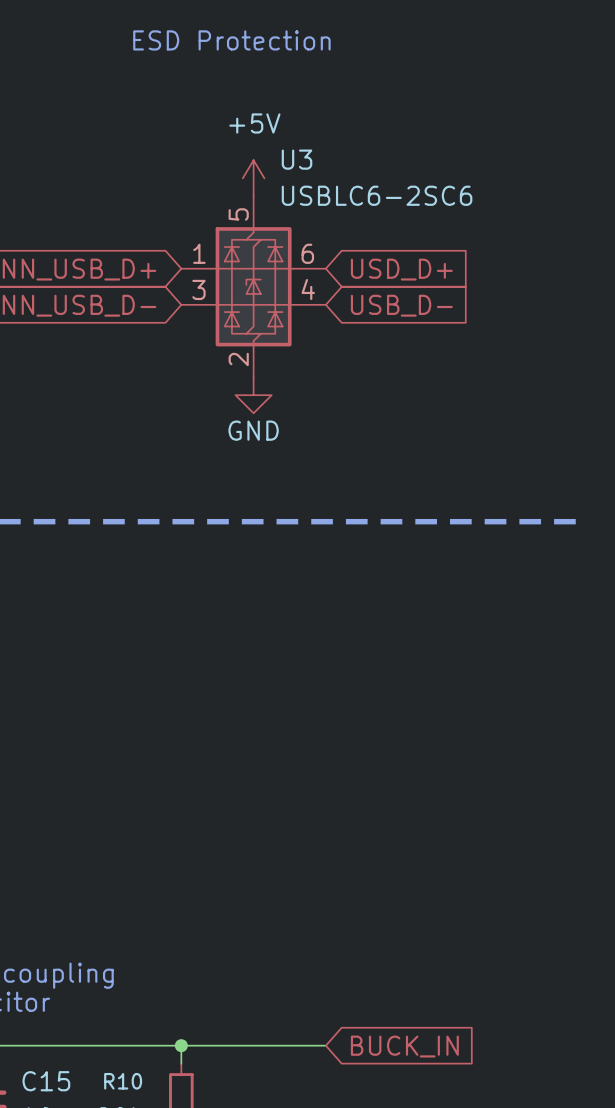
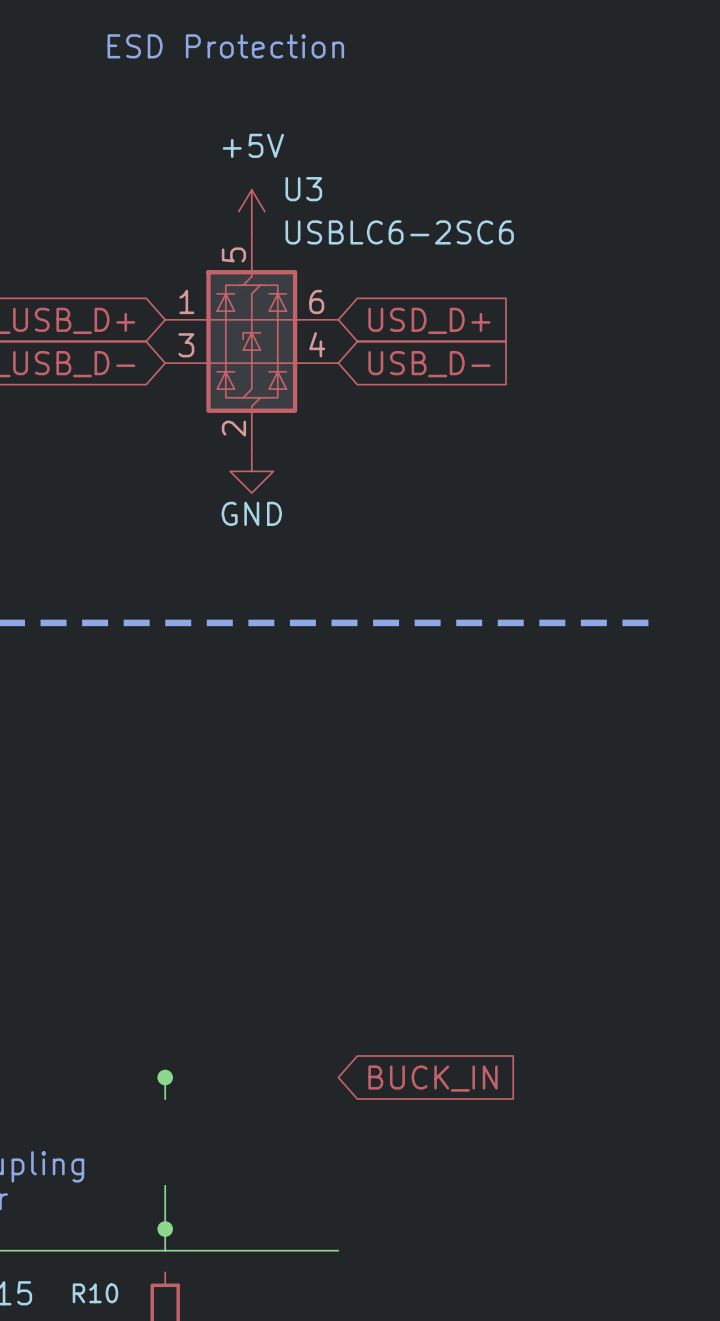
wire: none -> (165, 1077) (165, 1099)
junction: none -> (165, 1077)
wire: (181, 1045) (181, 1063) -> (165, 1250) (165, 1185)
junction position: (181, 1045) -> (165, 1229)
global label position: BUCK_IN (404, 1046) -> BUCK_IN (433, 1078)

